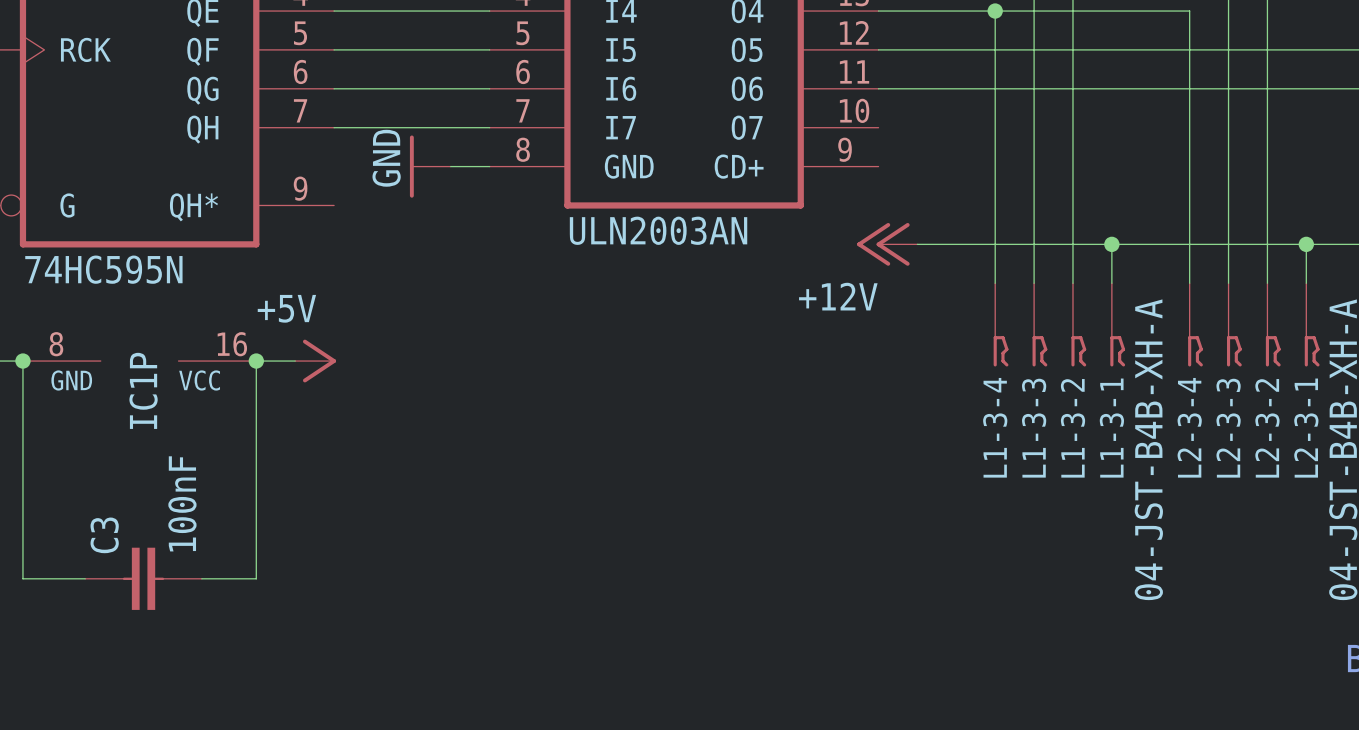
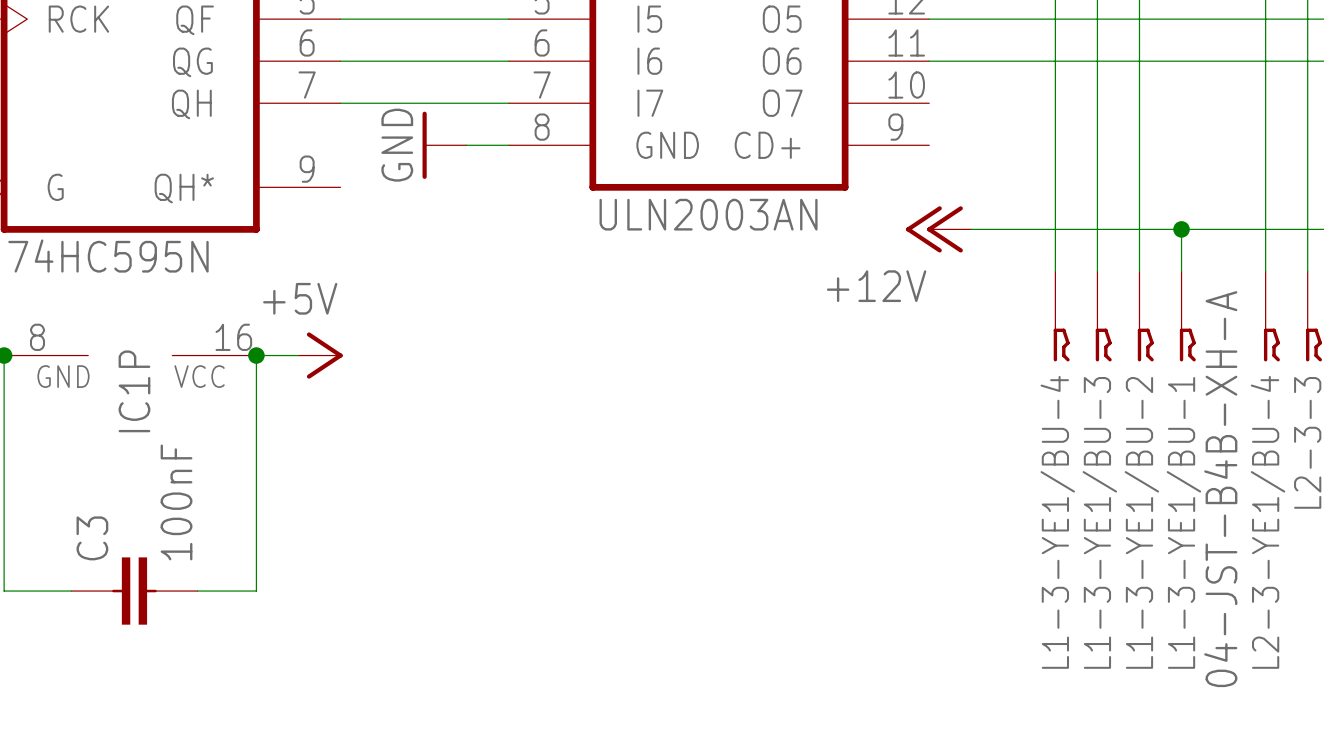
L1-3-4 name: L1-3-4 (995, 427) -> L1-3-YE1/BU-4 (1057, 522)
L2-3-4 name: L2-3-4 (1189, 427) -> L2-3-YE1/BU-4 (1268, 522)
L1-3-3 name: L1-3-3 (1034, 428) -> L1-3-YE1/BU-3 (1099, 522)
L1-3-2 name: L1-3-2 (1073, 428) -> L1-3-YE1/BU-2 (1141, 522)
L1-3-1 name: L1-3-1 (1111, 428) -> L1-3-YE1/BU-1 (1183, 522)

